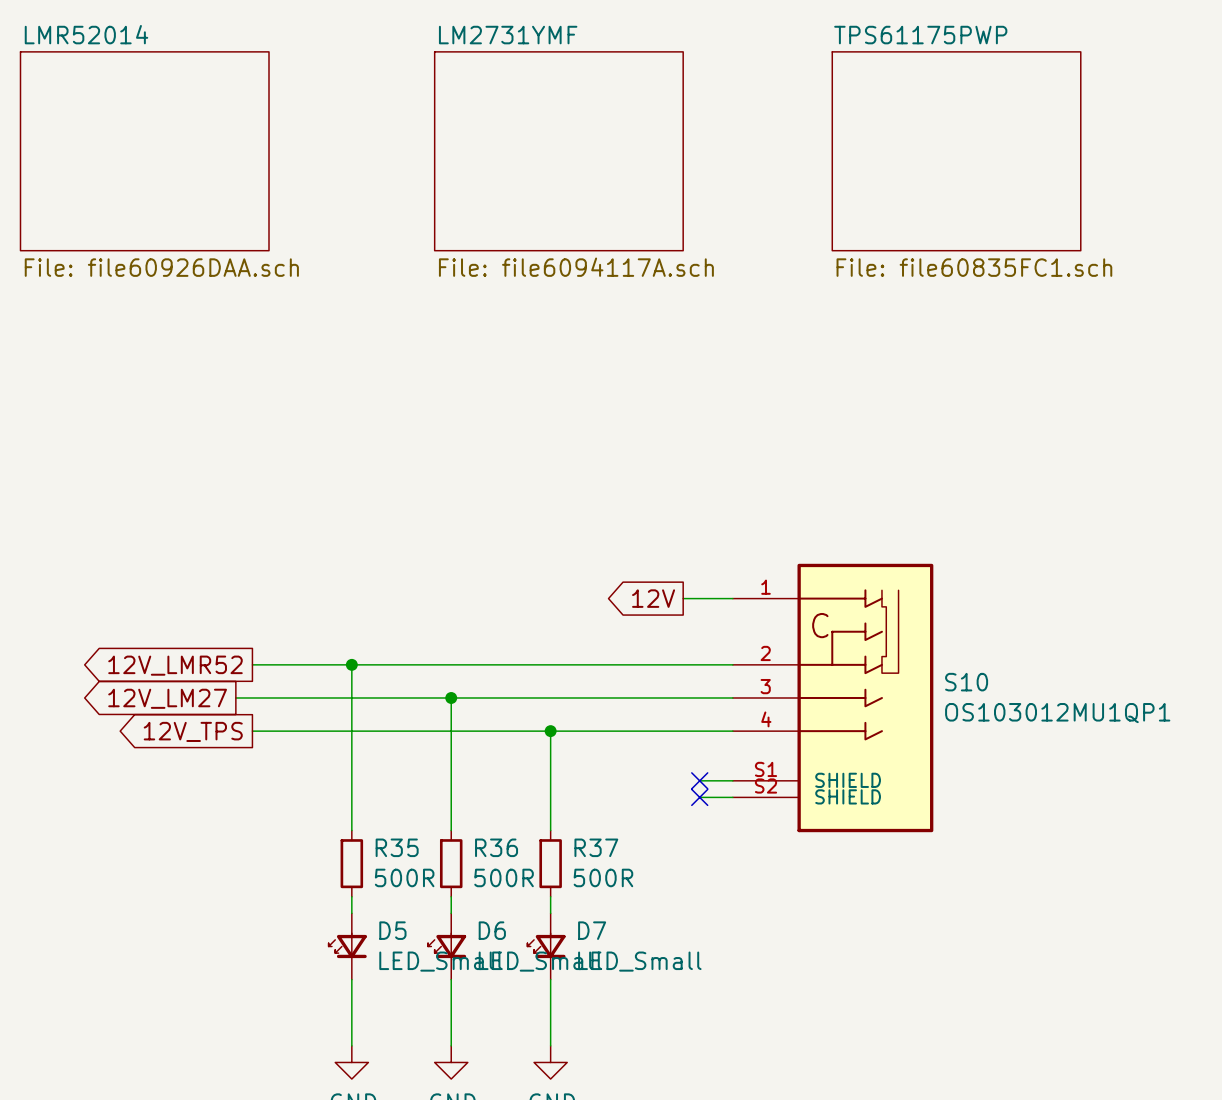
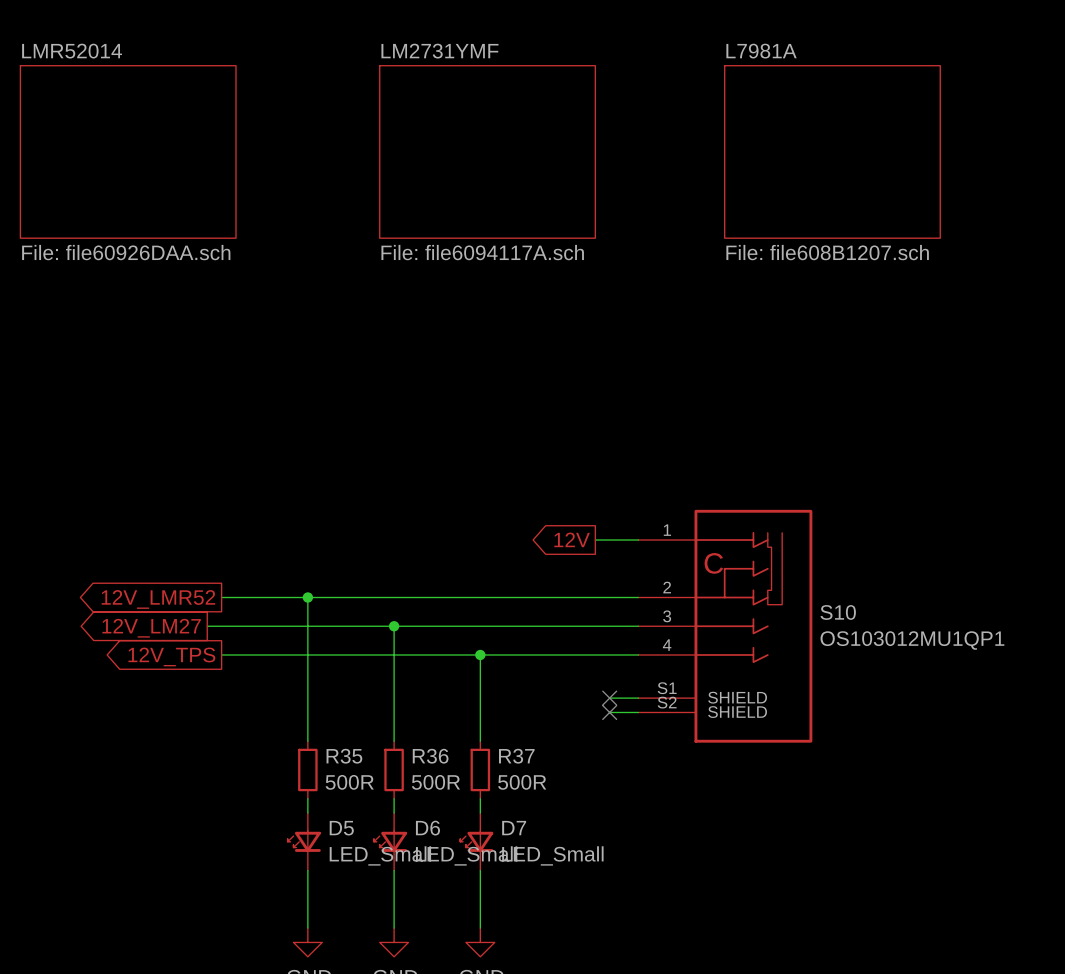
sheet TPS61175PWP name: TPS61175PWP (920, 35) -> L7981A (761, 51)
sheet TPS61175PWP value: File: file60835FC1.sch (974, 267) -> File: file608B1207.sch (827, 252)

